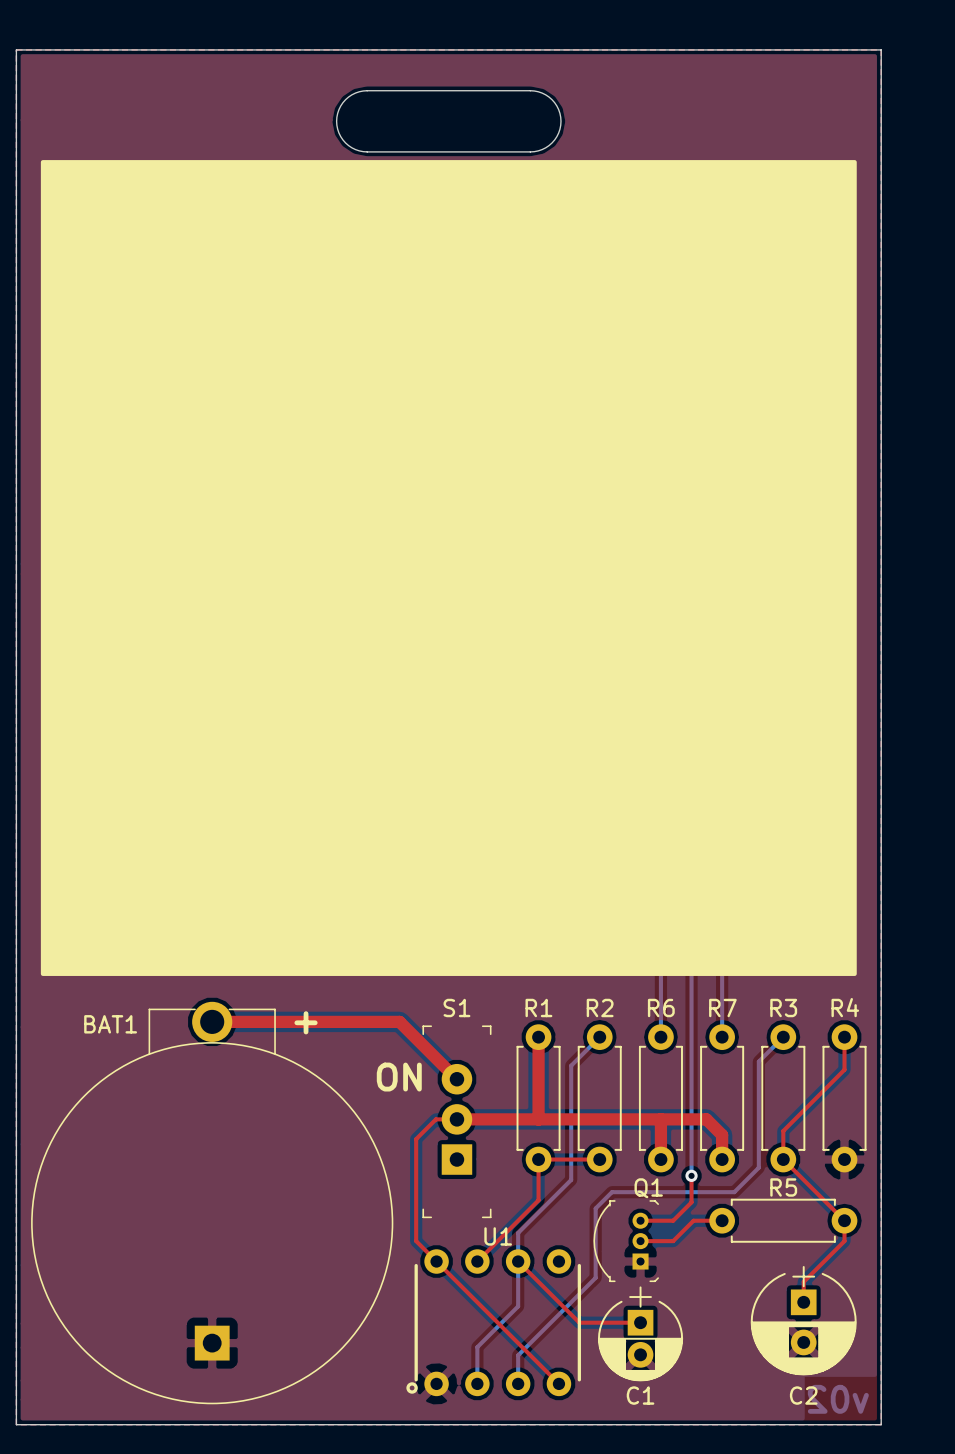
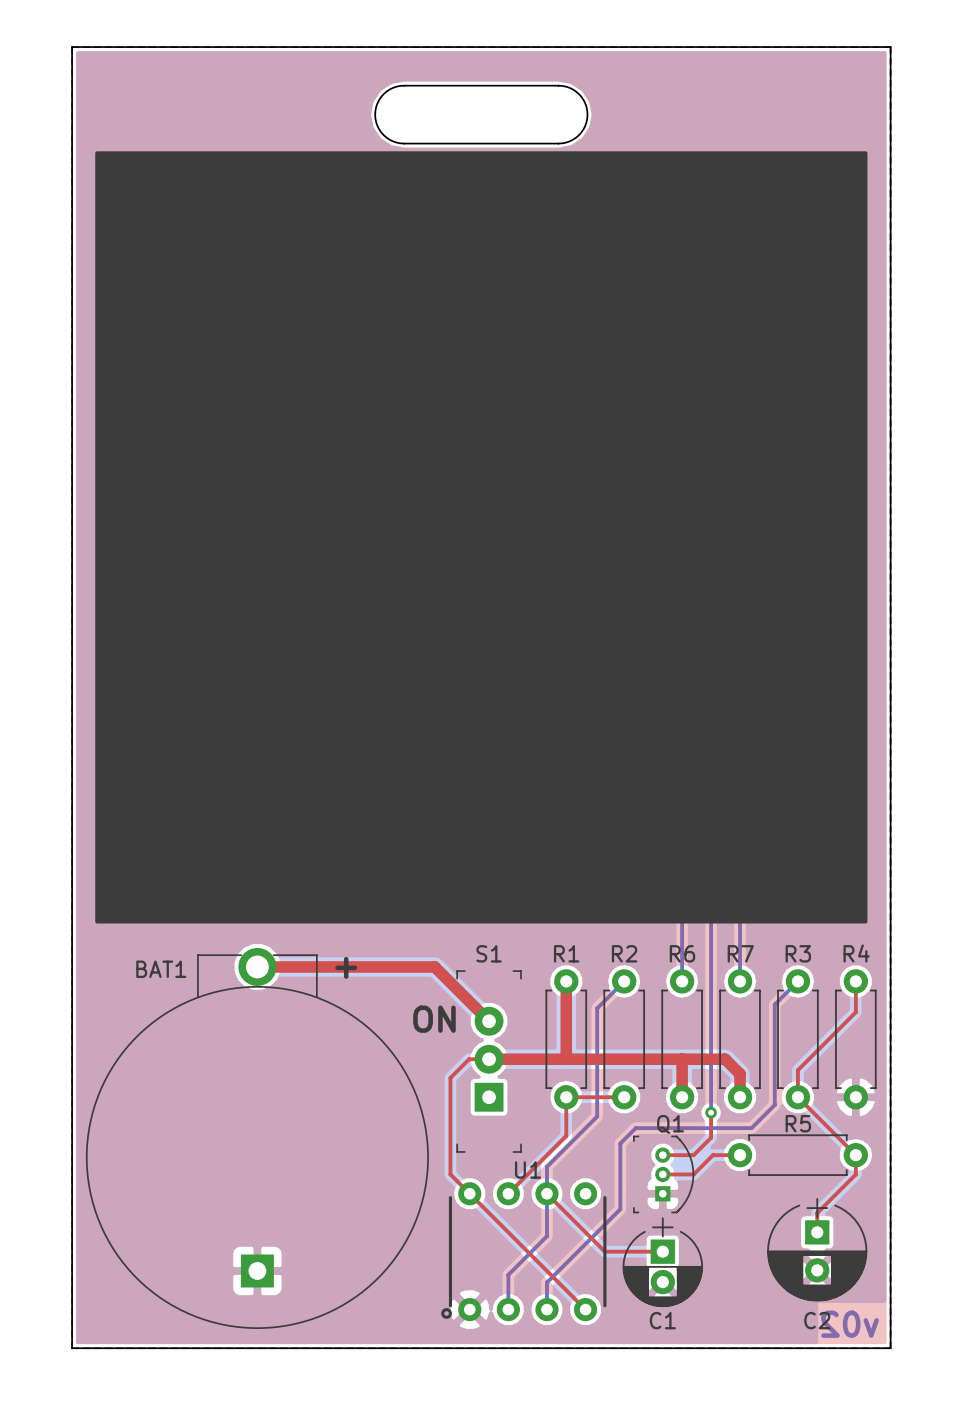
line: (609, 1204) (598, 1221) (594, 1240) (598, 1260) (609, 1277) -> none
line: none -> (679, 1139) (690, 1156) (693, 1176) (688, 1195) (677, 1211)

